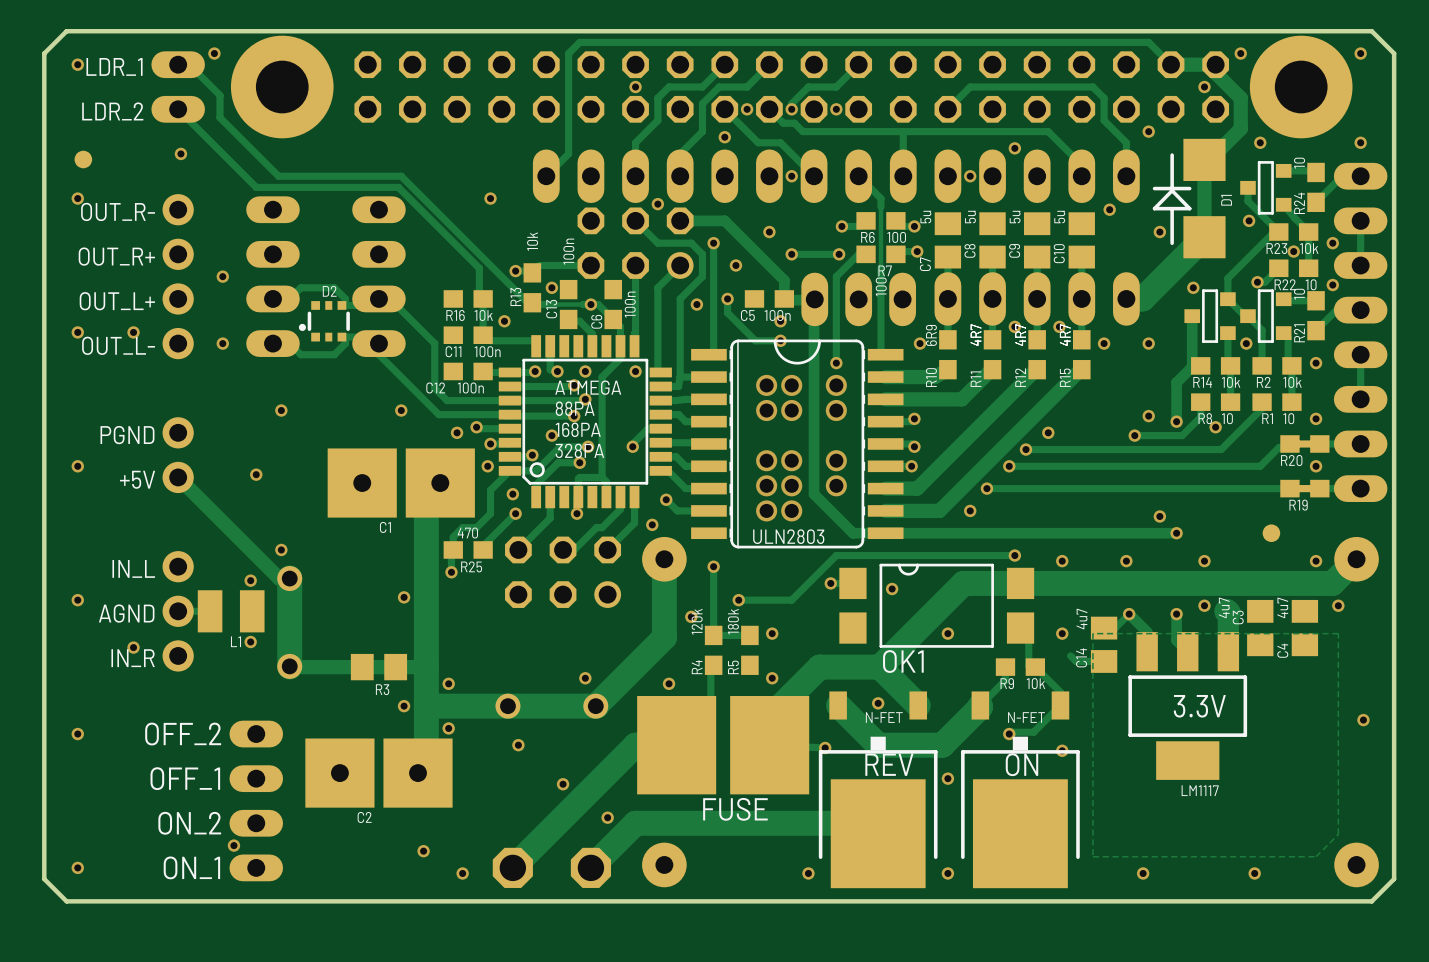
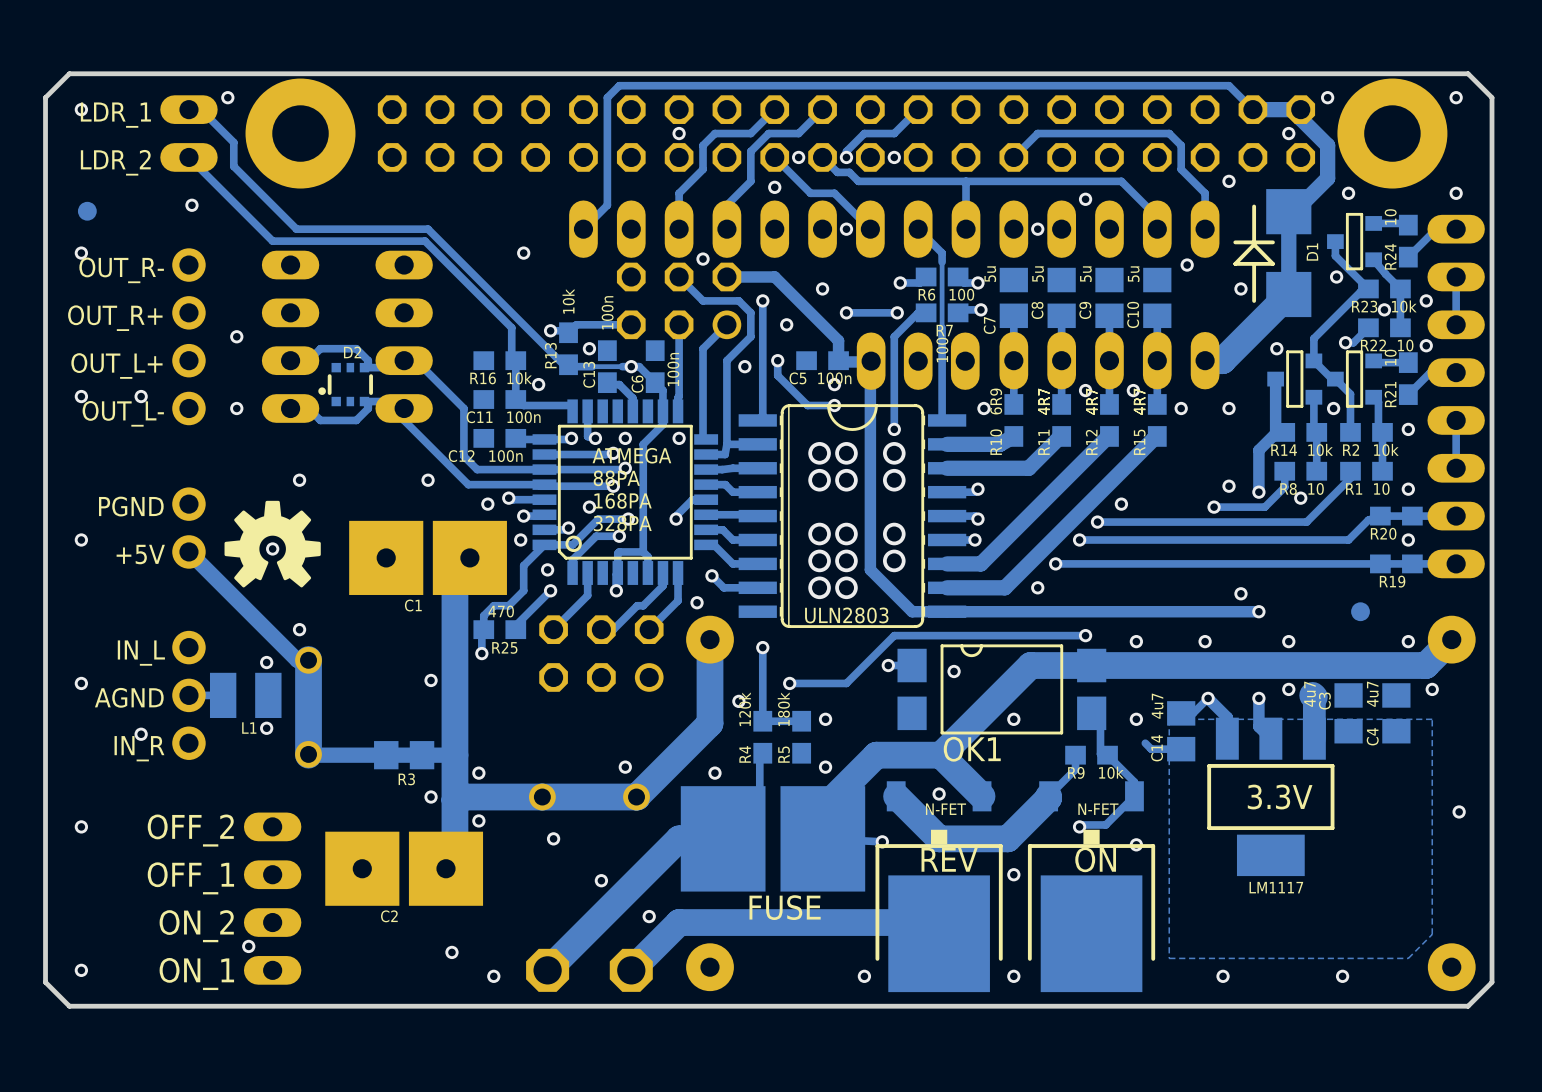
drawing: none -> [224, 500, 321, 588]

